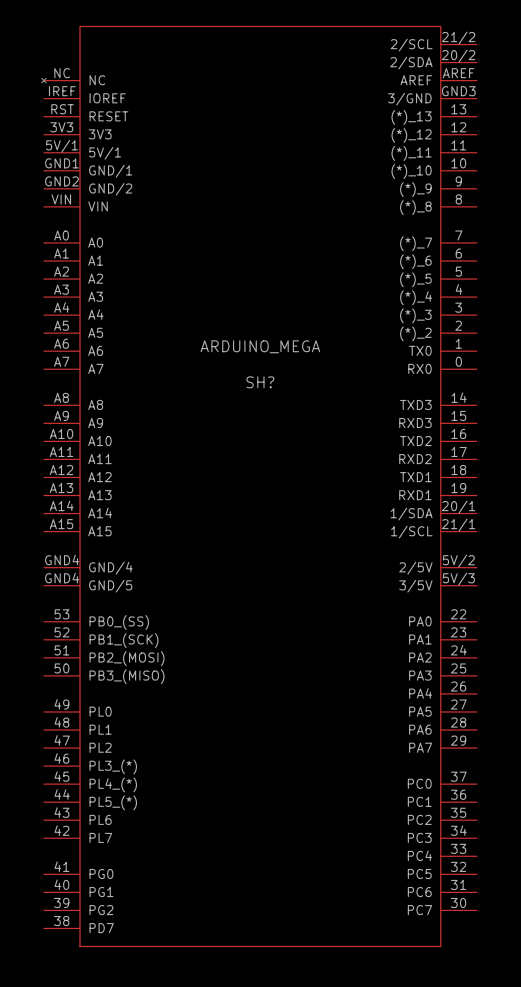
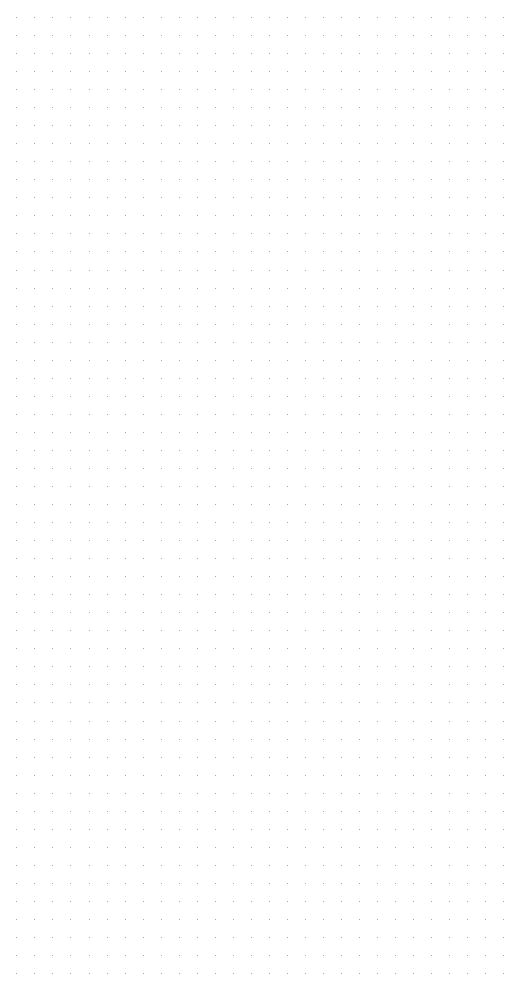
SH?: ARDUINO_MEGA (259, 486) -> none

